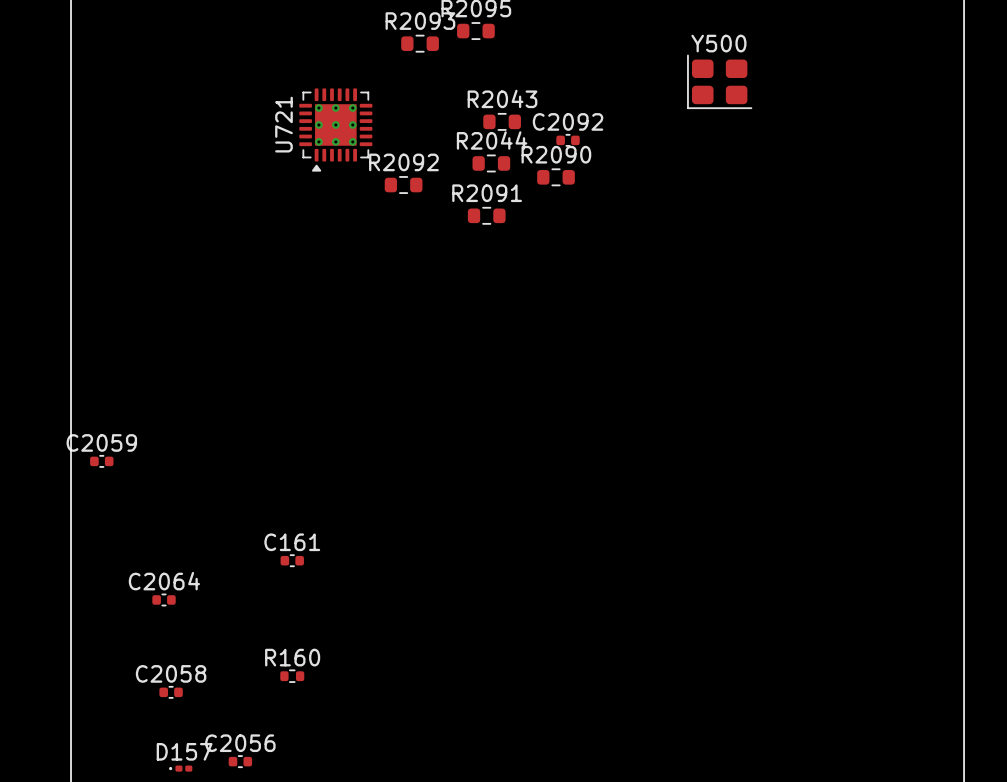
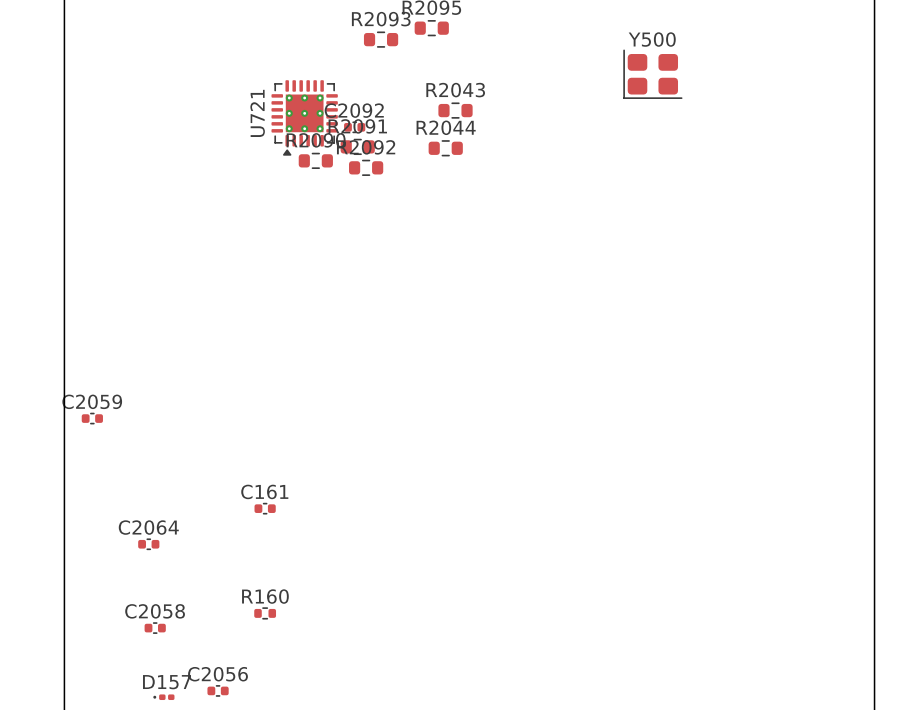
C2092 position: (568, 140) -> (354, 127)
R2090 position: (556, 177) -> (315, 160)
R2091 position: (486, 215) -> (357, 146)

